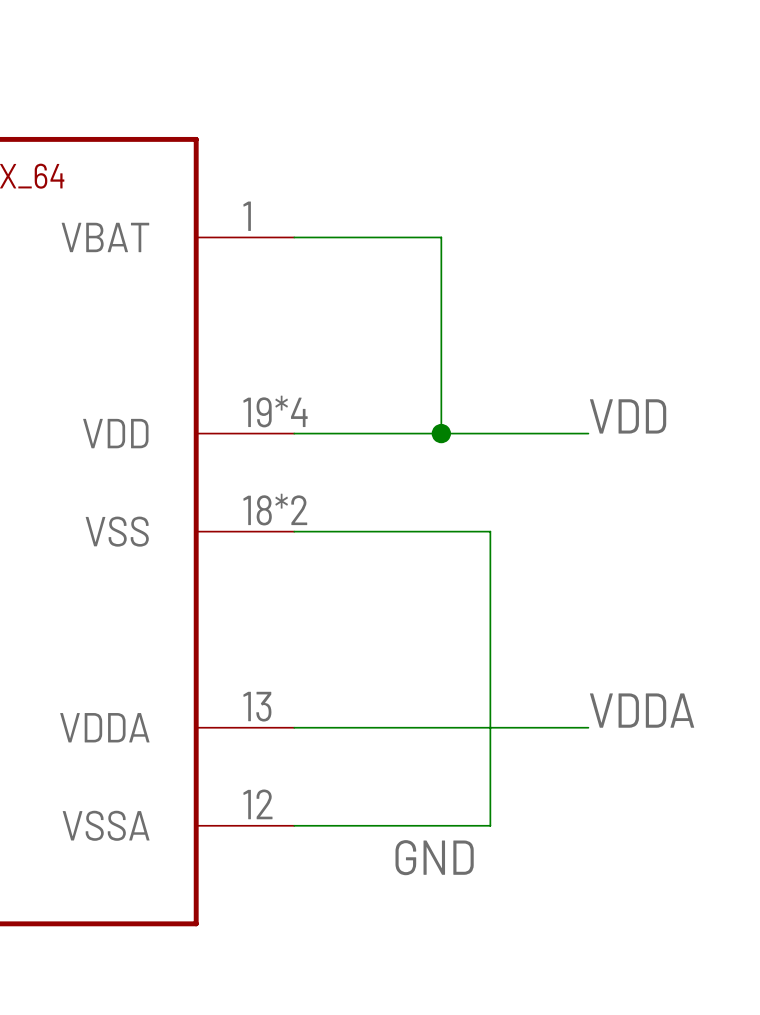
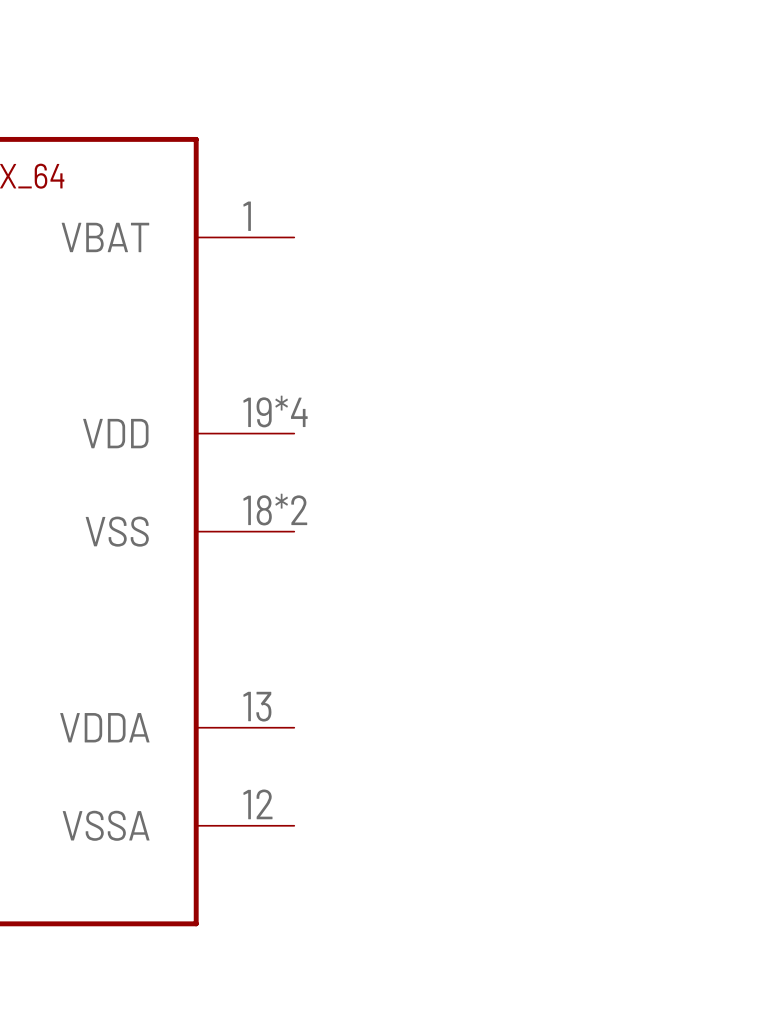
wire: (294, 237) (441, 237) (441, 433) -> none
label: VDD (628, 416) -> none
wire: (294, 433) (588, 433) -> none
junction: (441, 433) -> none
wire: (294, 531) (490, 531) (490, 825) (294, 825) -> none
label: VDDA (642, 710) -> none
wire: (294, 727) (588, 727) -> none
label: GND (434, 857) -> none

